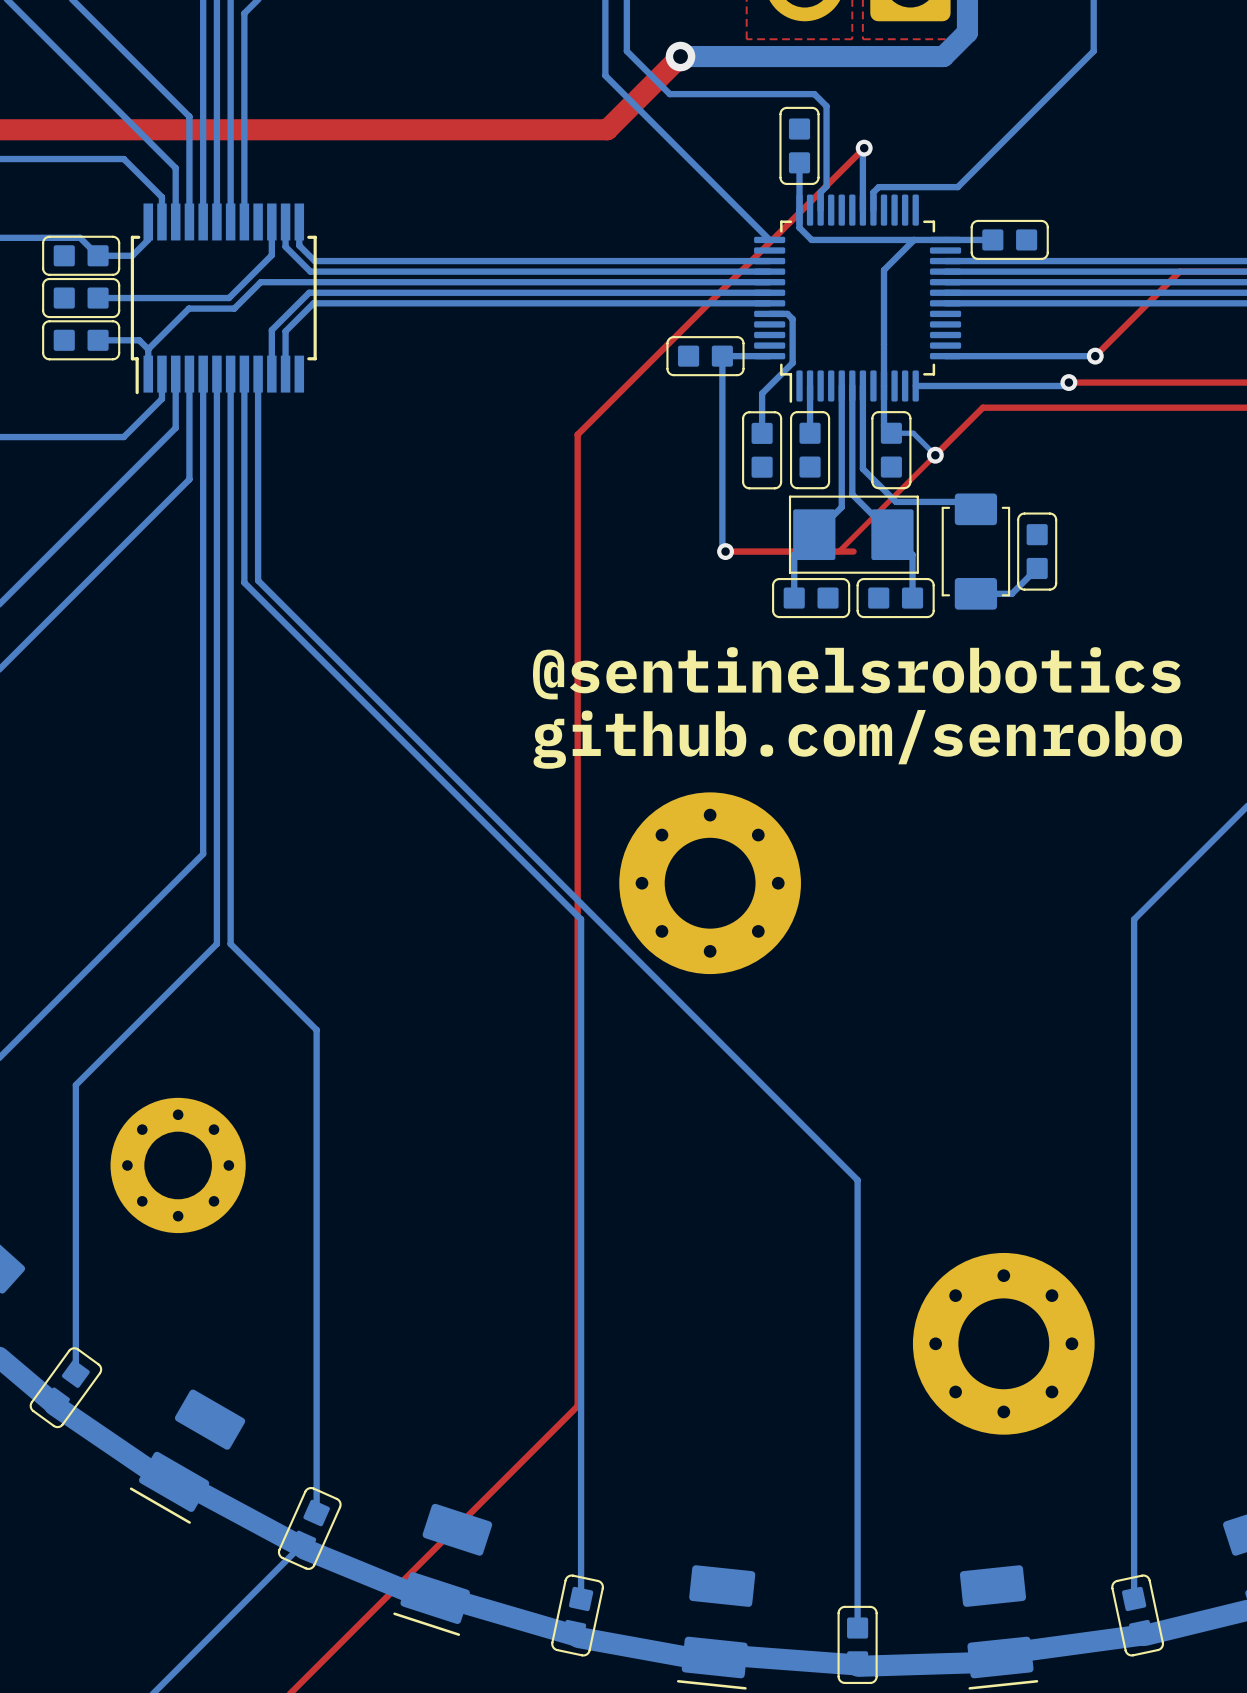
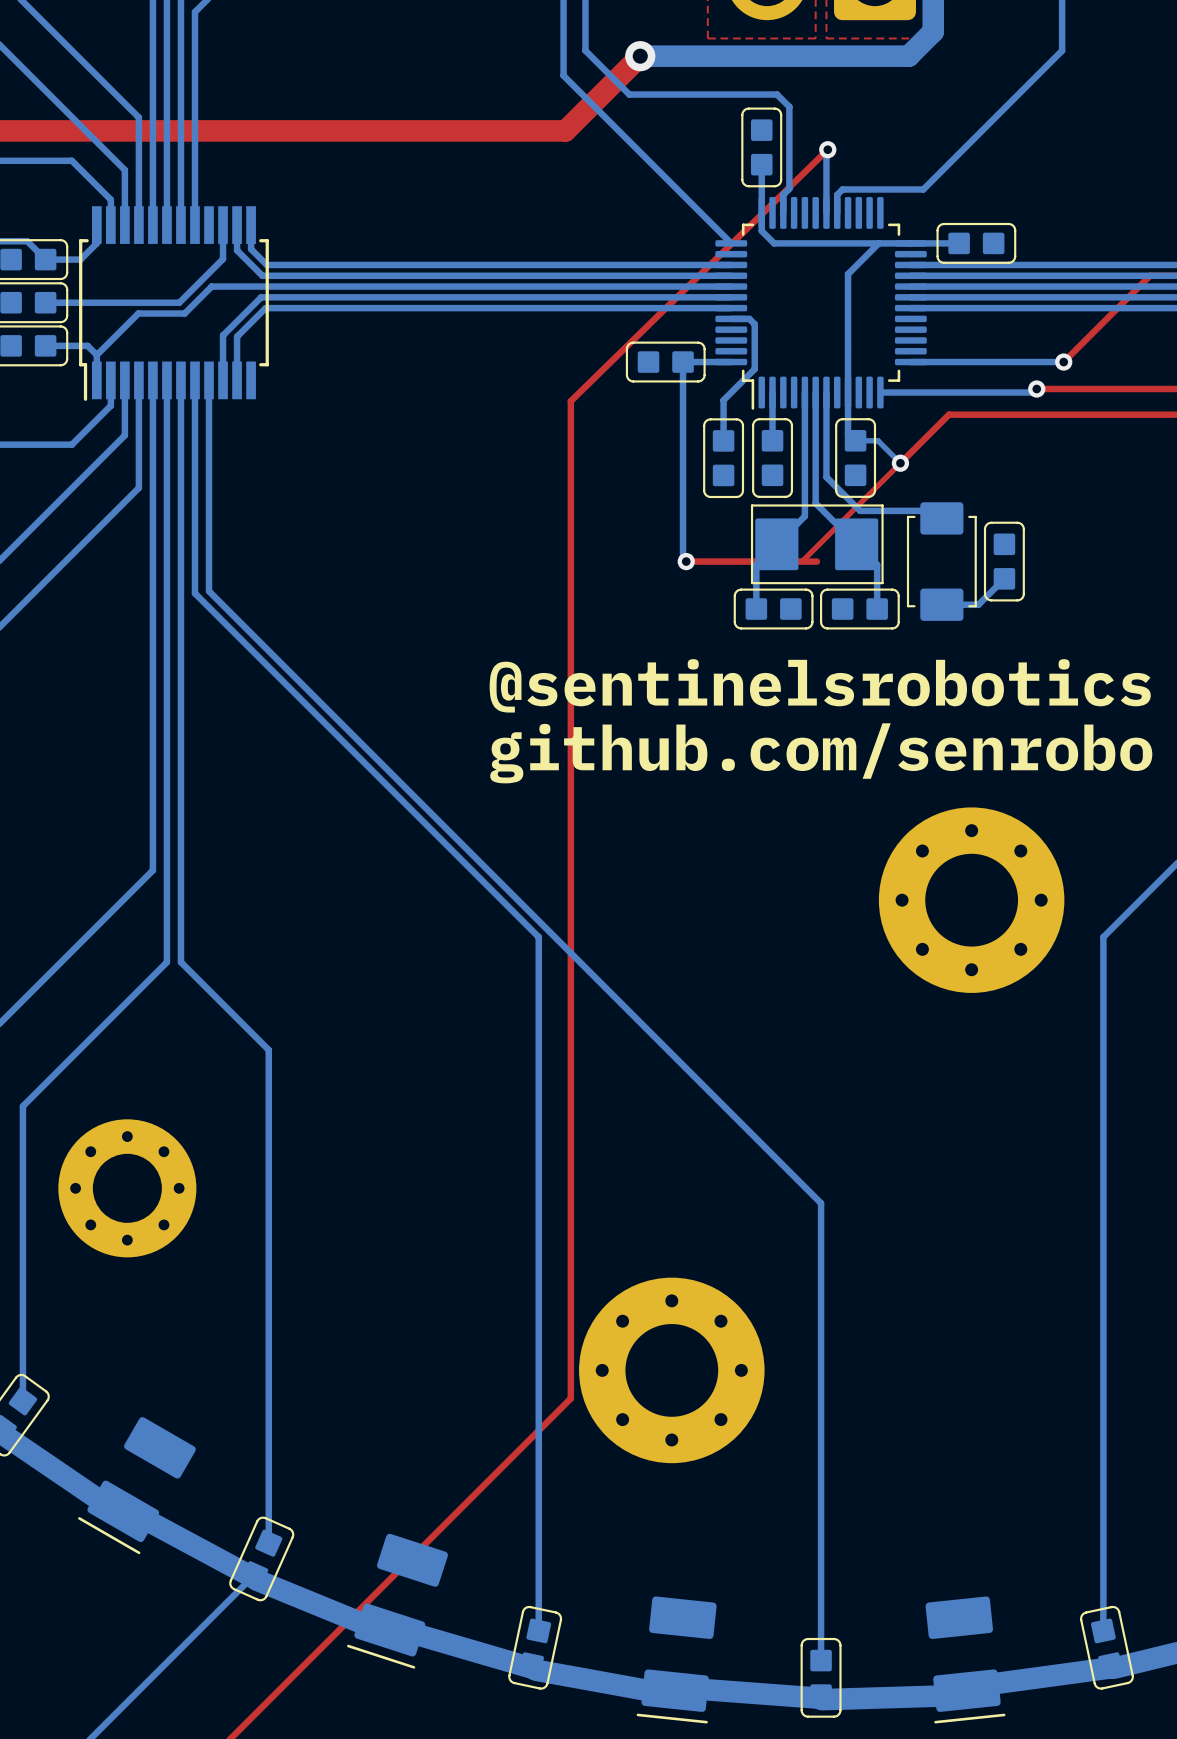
top track: (864, 148) (577, 434) (577, 1406) -> (827, 149) (570, 401) (570, 1398) (535, 1434)
part: (710, 883) -> none
part: none -> (971, 900)
part: none -> (671, 1370)
part: (1003, 1343) -> none

